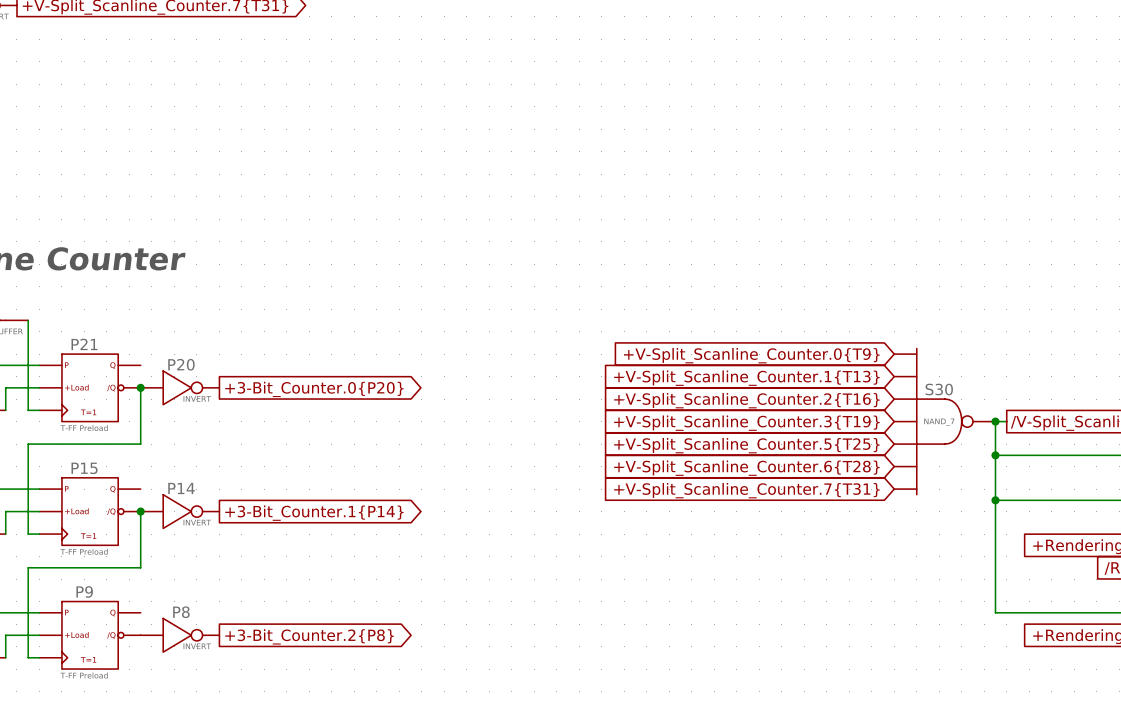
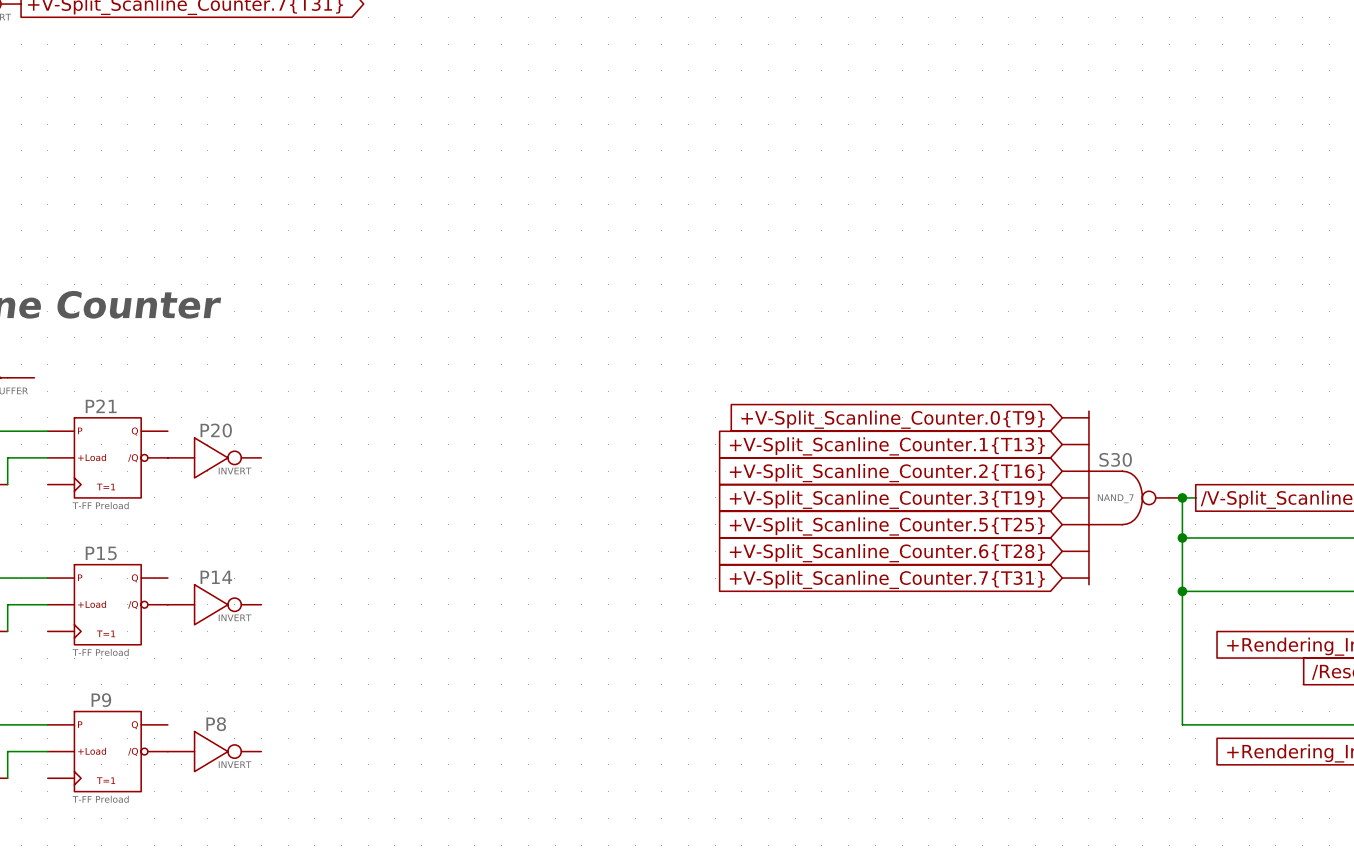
wire: (28, 320) (28, 410) (39, 410) -> none
wire: (140, 387) (140, 444) (28, 444) (28, 534) (39, 534) -> none
junction: (140, 387) -> none
global label: +3-Bit_Counter.0{P20} (314, 389) -> none
wire: (140, 511) (140, 567) (28, 567) (28, 657) (39, 657) -> none
junction: (140, 511) -> none
global label: +3-Bit_Counter.1{P14} (314, 513) -> none
global label: +3-Bit_Counter.2{P8} (309, 636) -> none

